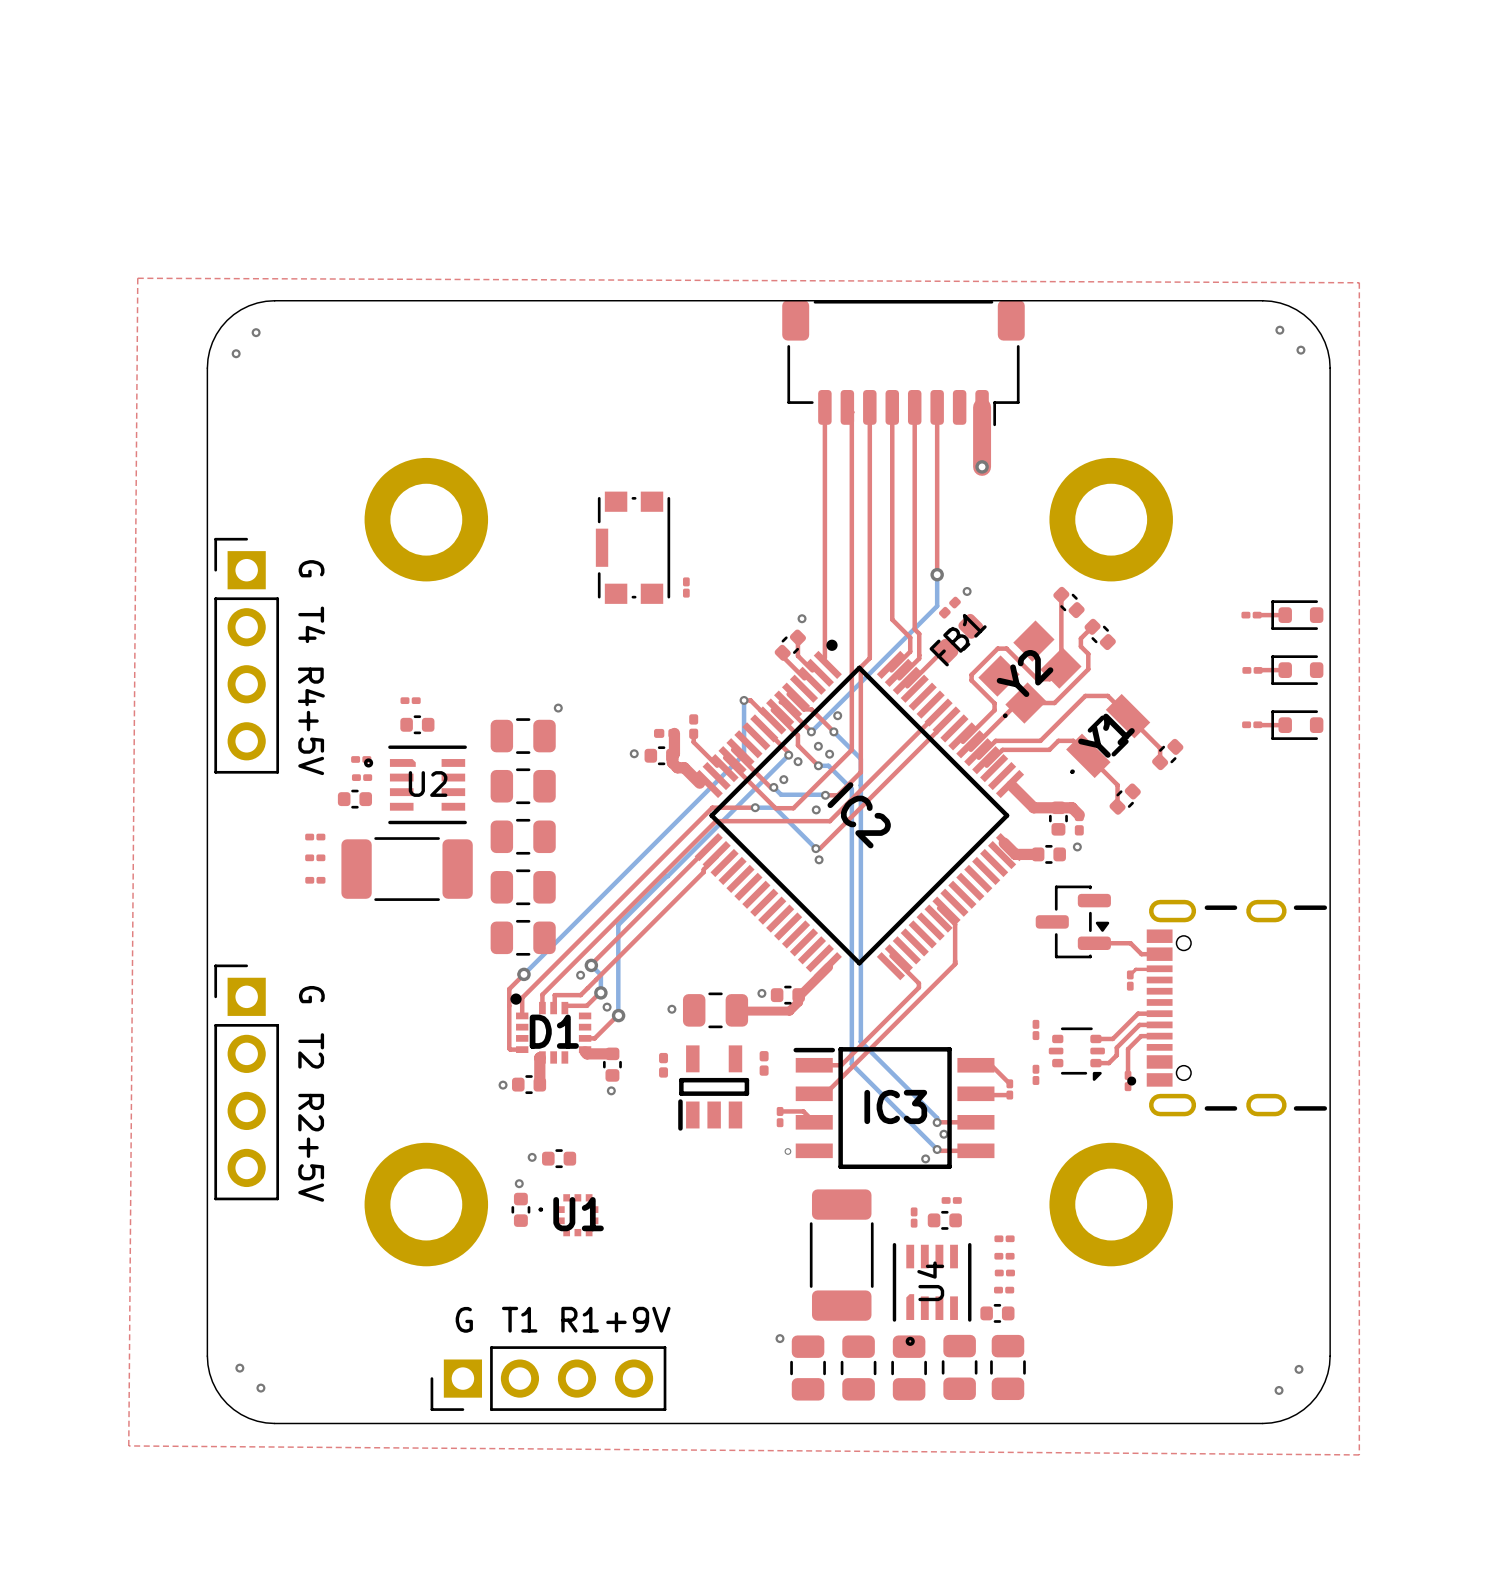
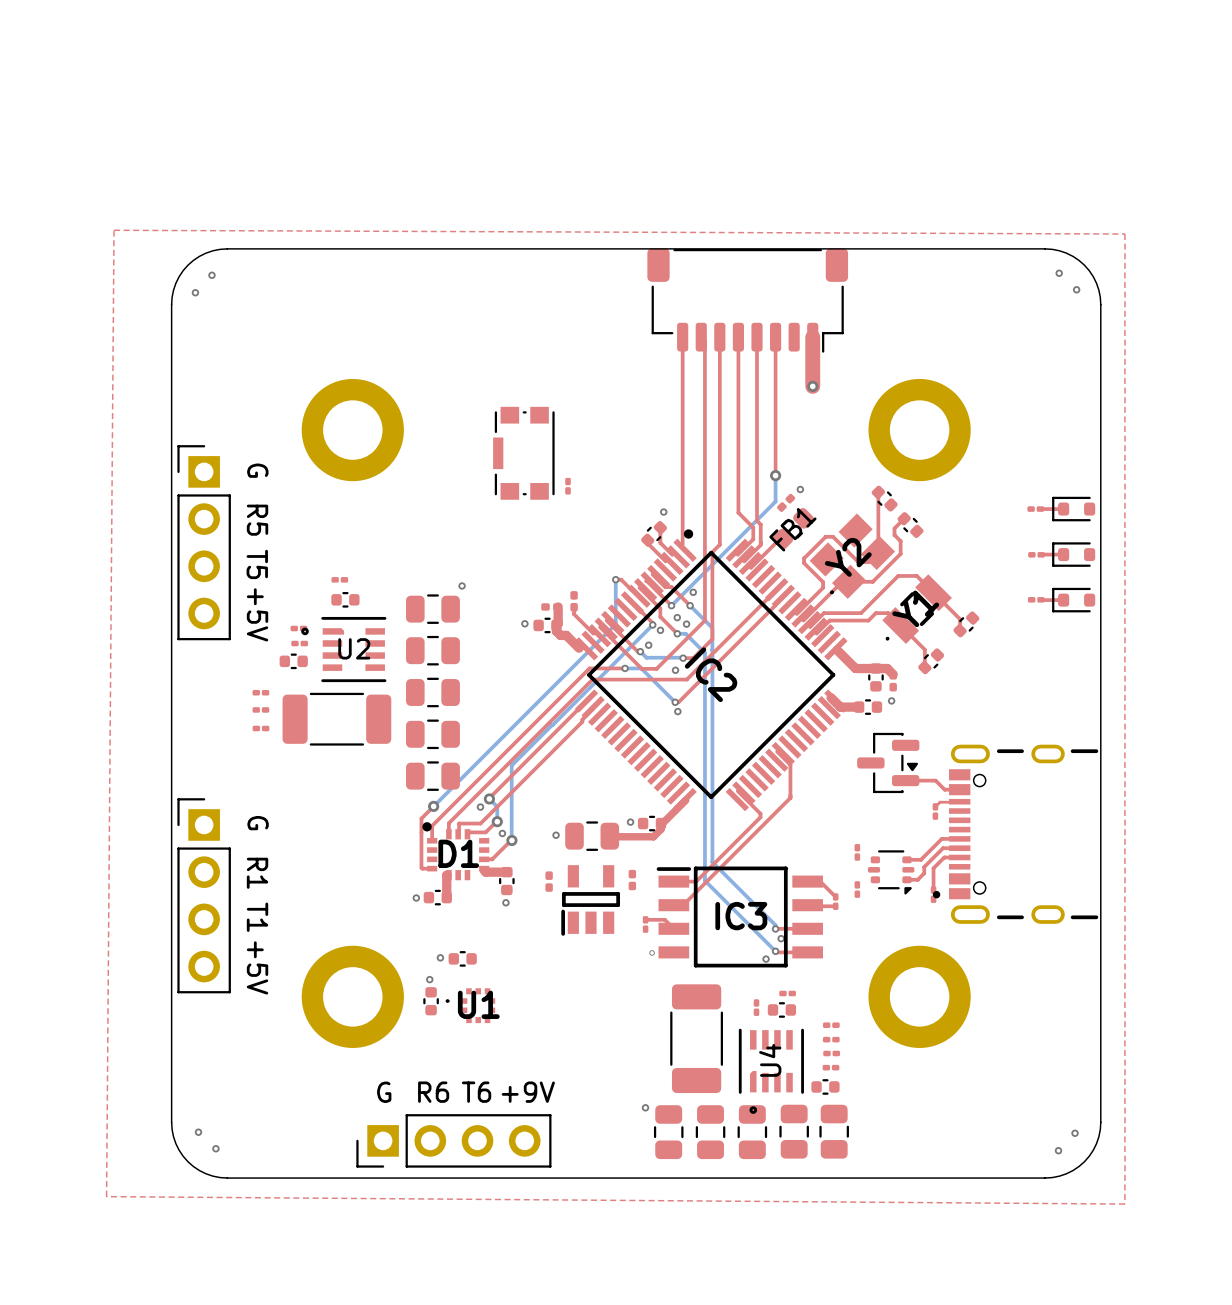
text: T4 (311, 624) -> R5 (257, 520)
text: R4 (311, 686) -> T5 (257, 564)
text: T2 (311, 1050) -> R1 (257, 873)
text: R2 (311, 1112) -> T1 (257, 917)
text: T1 (519, 1319) -> R6 (433, 1092)
text: R1 (580, 1319) -> T6 (476, 1092)

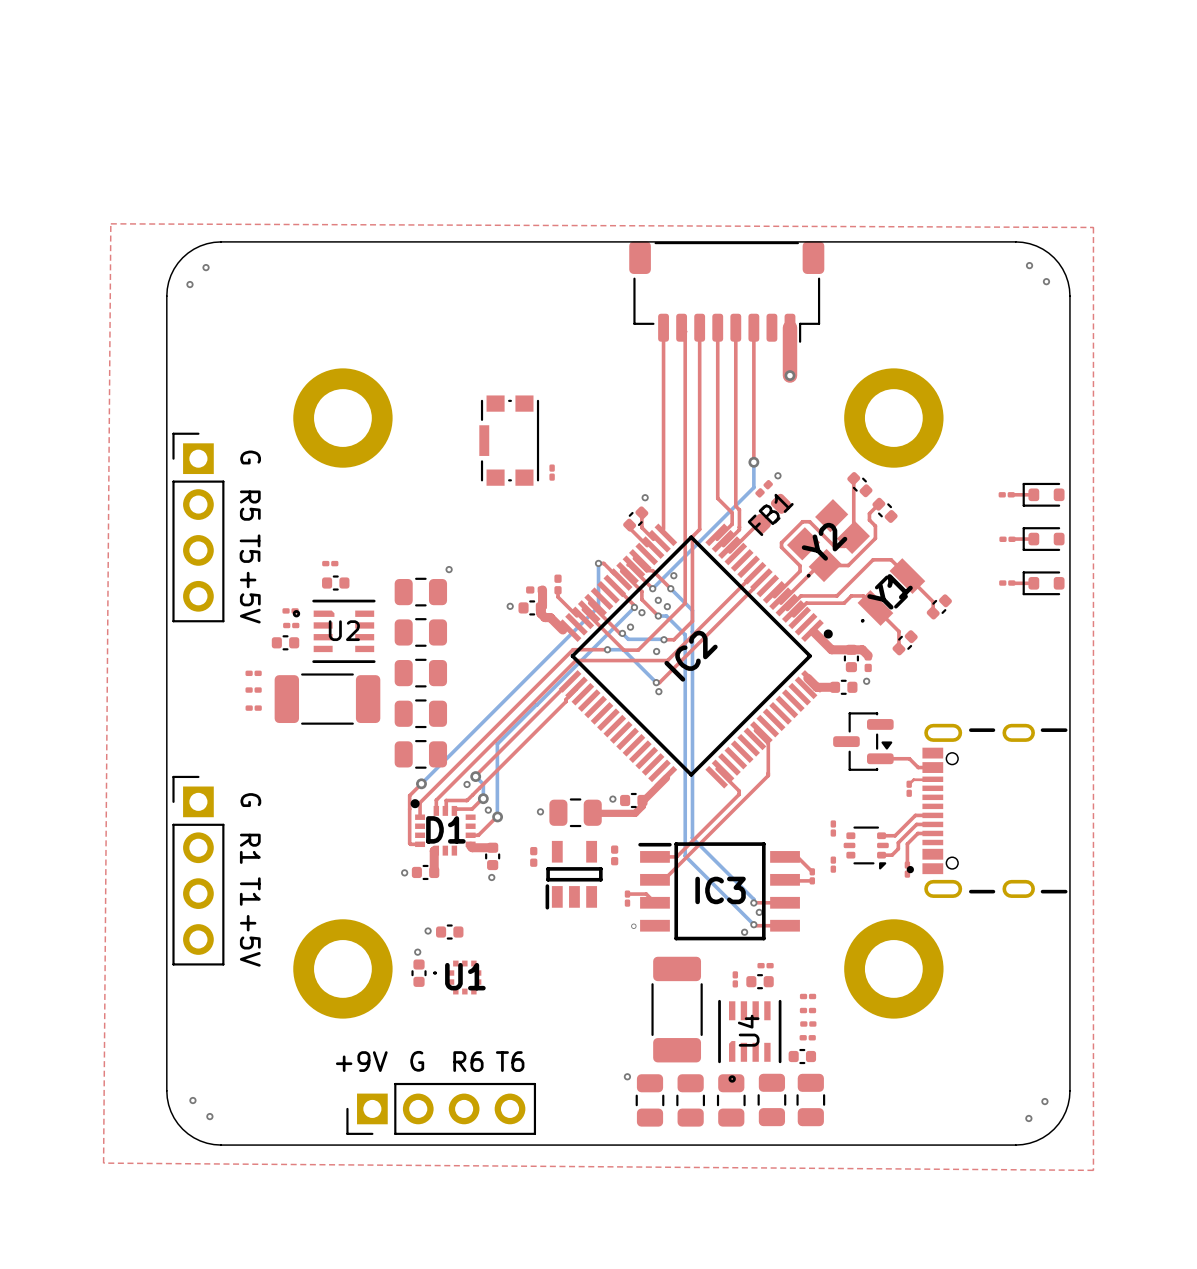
IC2 rotation: 0° (711, 670) -> 90° clockwise (695, 656)
text: none -> +9V (361, 1061)
text: G (384, 1092) -> none
text: R6 (433, 1092) -> G (417, 1061)
text: T6 (476, 1092) -> R6 (468, 1061)
text: +9V (528, 1092) -> T6 (510, 1061)

